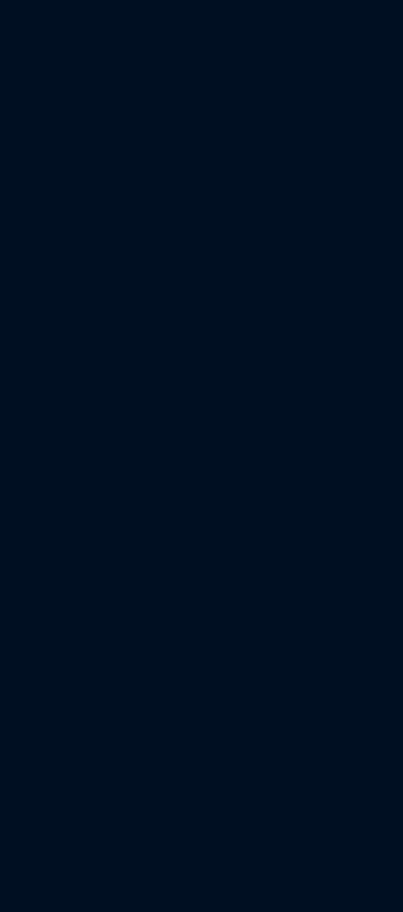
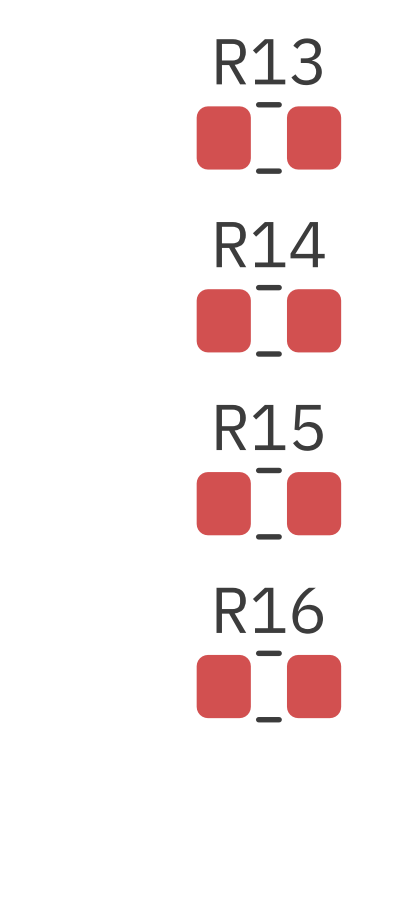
R13: none -> (268, 137)
R14: none -> (268, 320)
R15: none -> (268, 503)
R16: none -> (268, 686)

